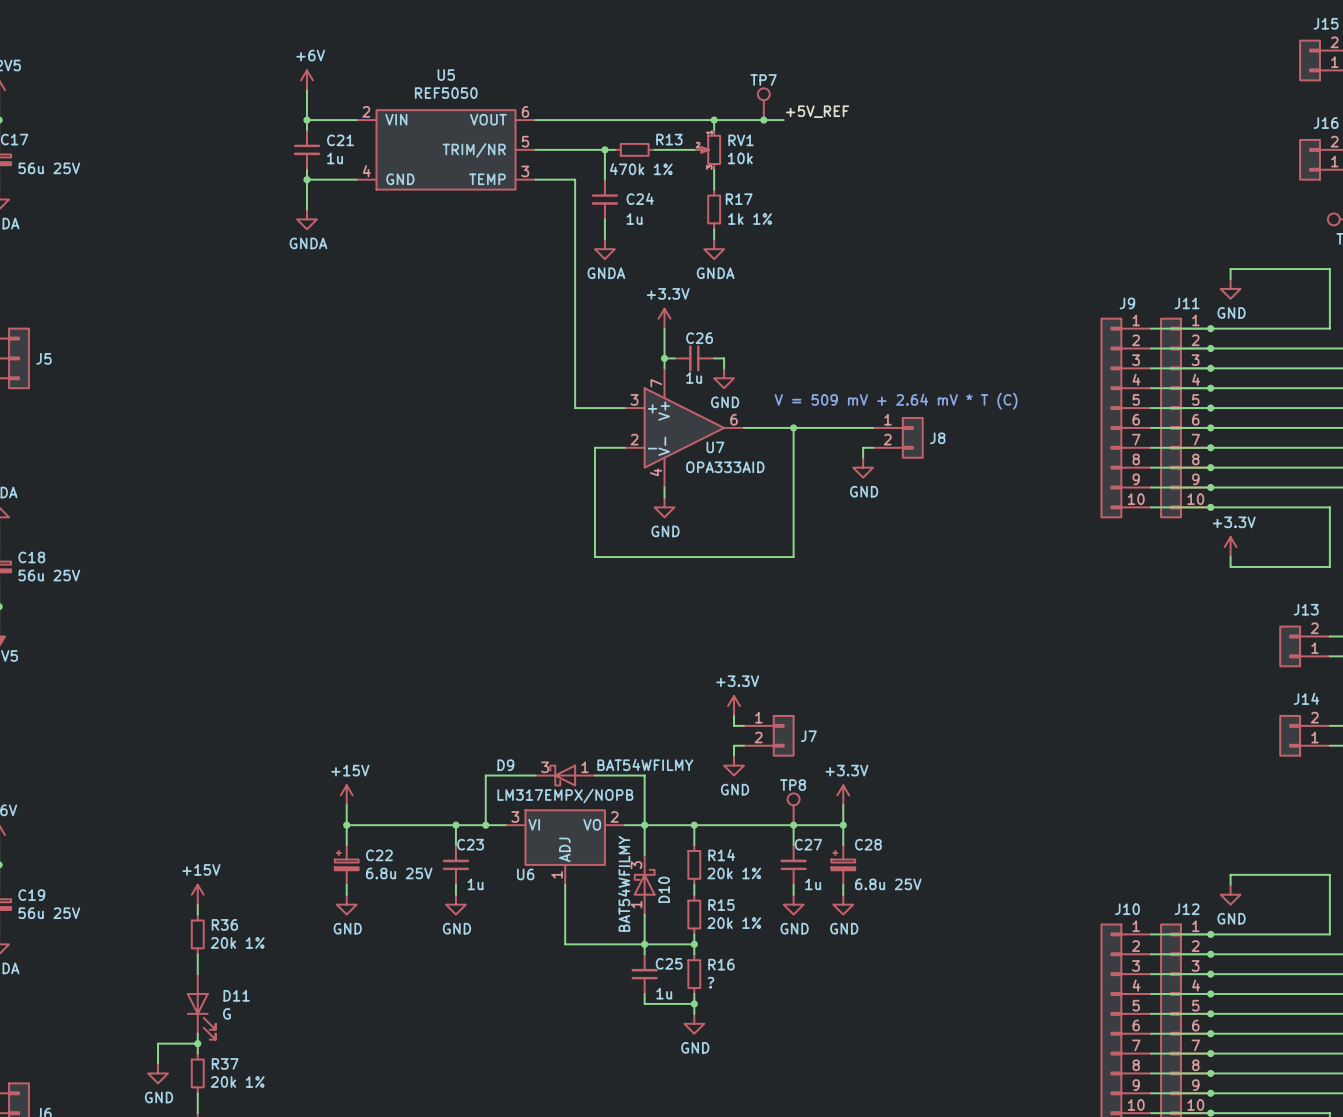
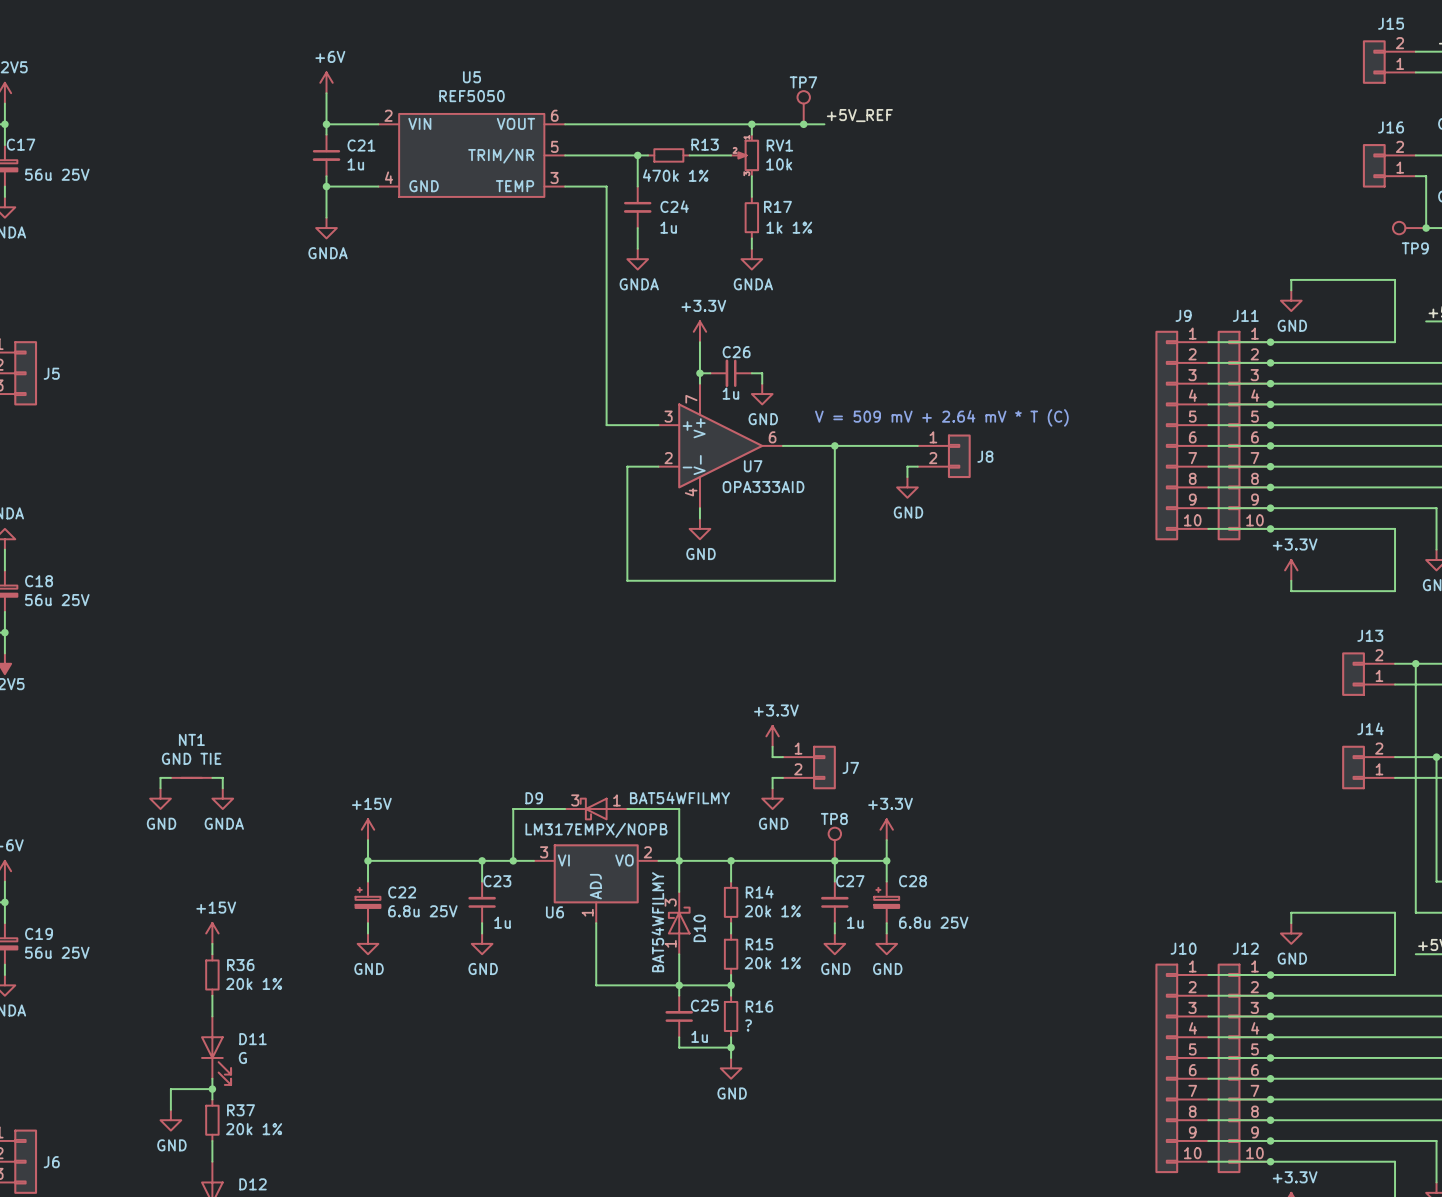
wire: none -> (170, 777) (160, 777) (160, 788)
NT1: none -> GND TIE (191, 777)
wire: none -> (212, 777) (222, 777) (222, 788)
power symbol: none -> GND (160, 798)
power symbol: none -> GNDA (222, 798)

